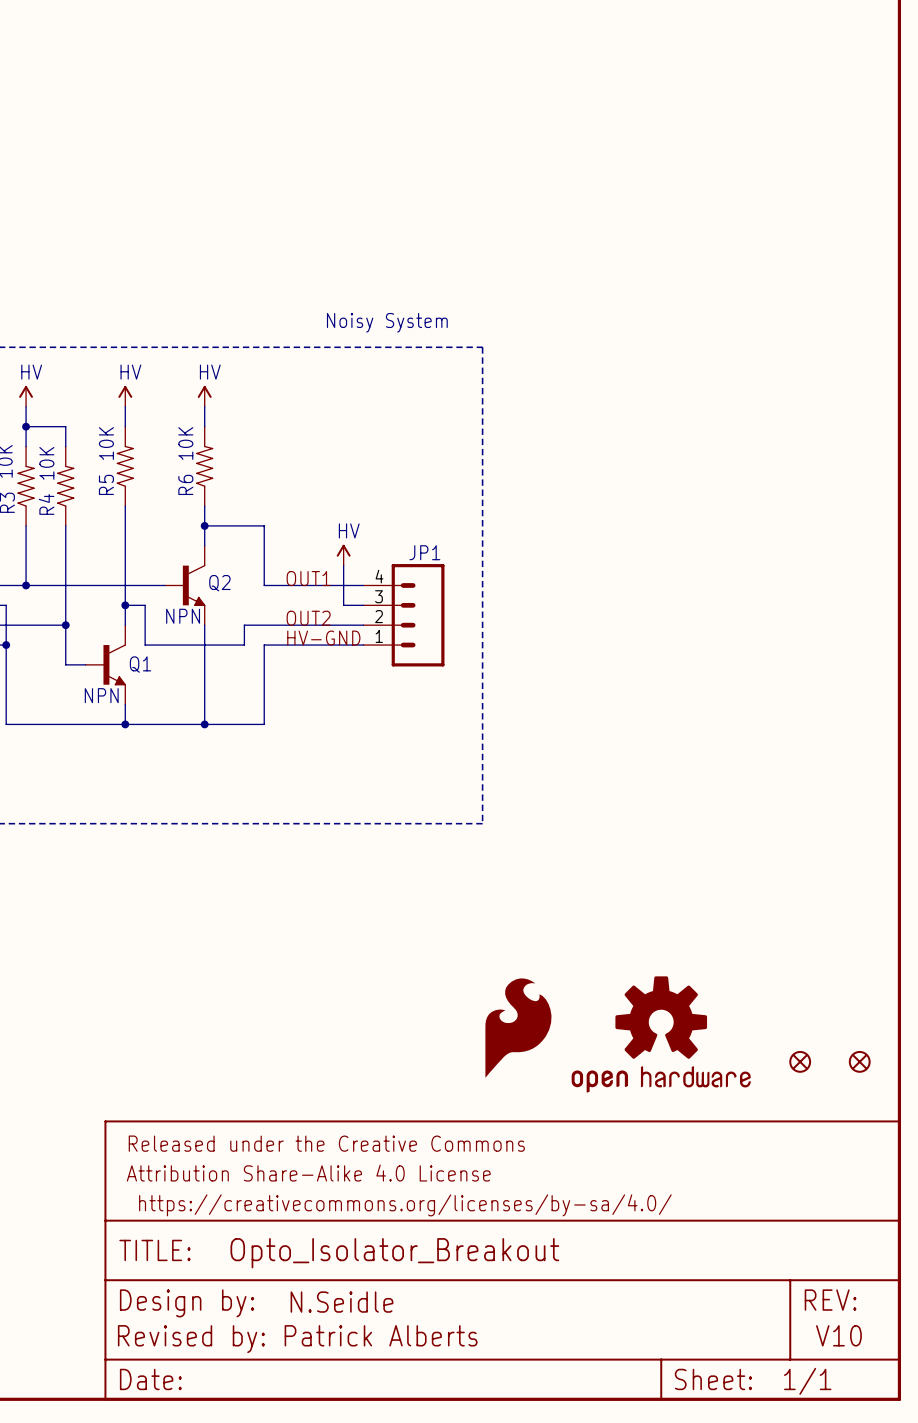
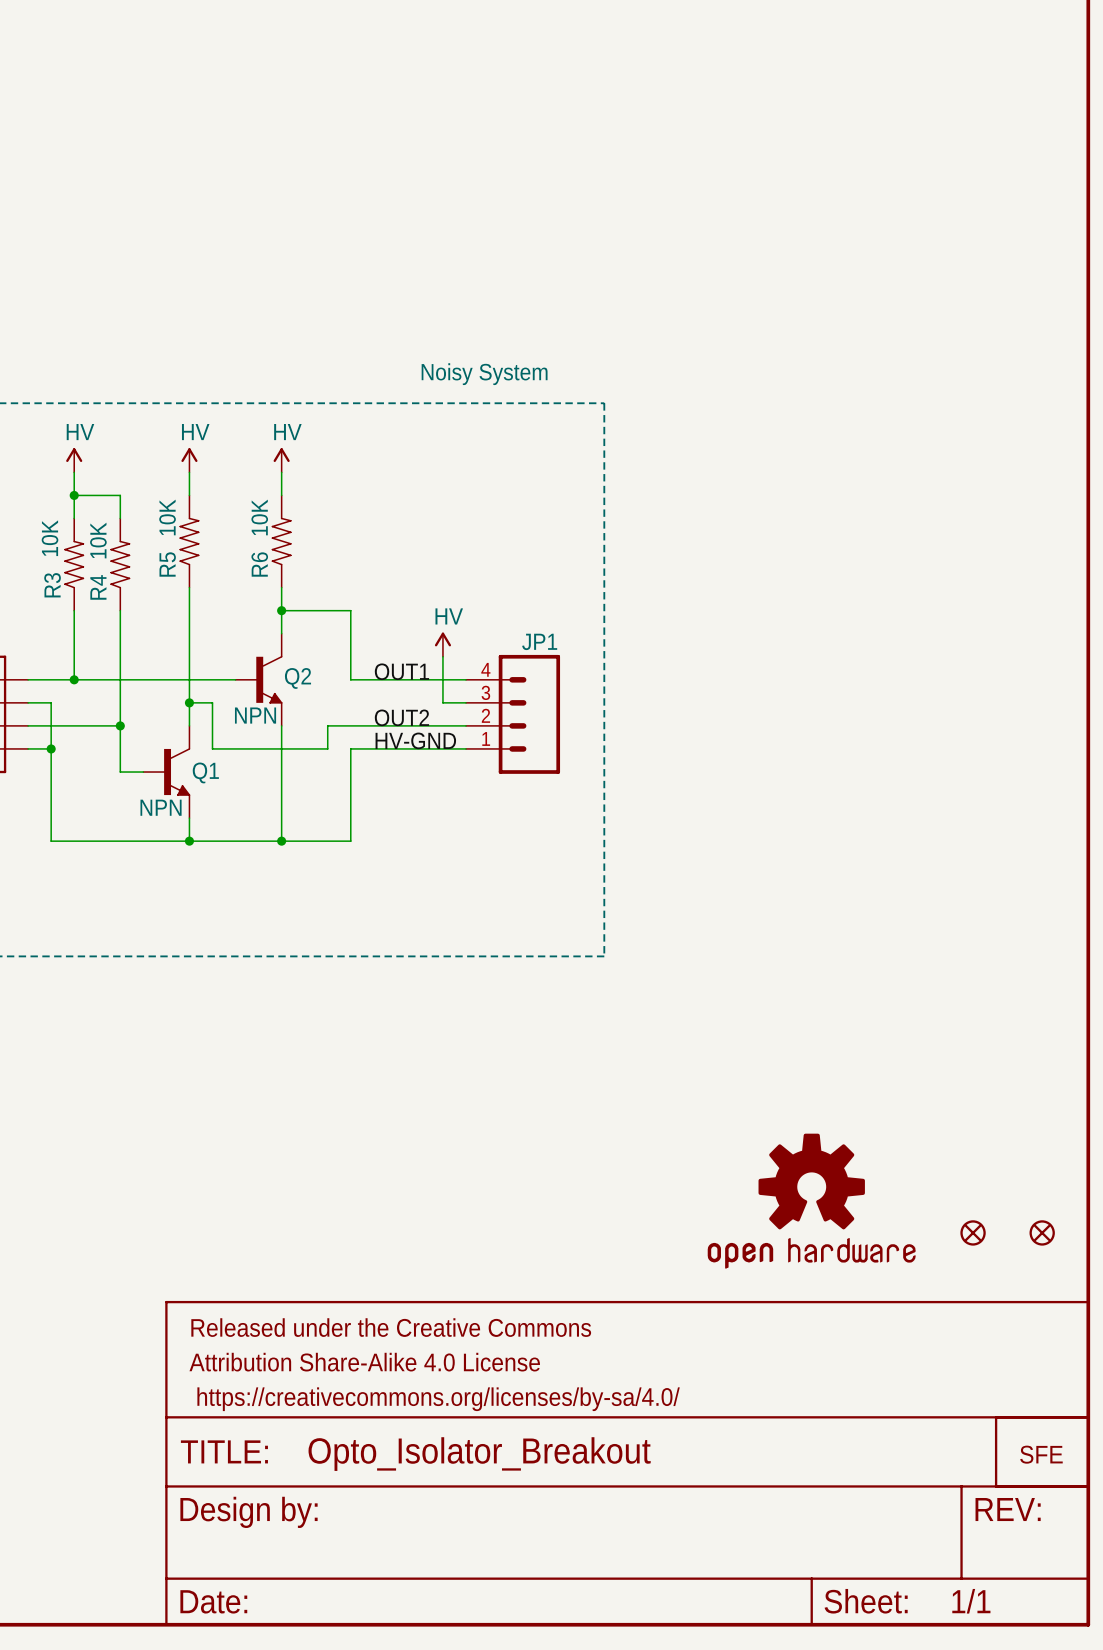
part: (518, 1028) -> none
part: none -> (1042, 1451)
text: N.Seidle (341, 1302) -> none
text: V10 (838, 1335) -> none
text: Revised by: Patrick Alberts (297, 1339) -> none

